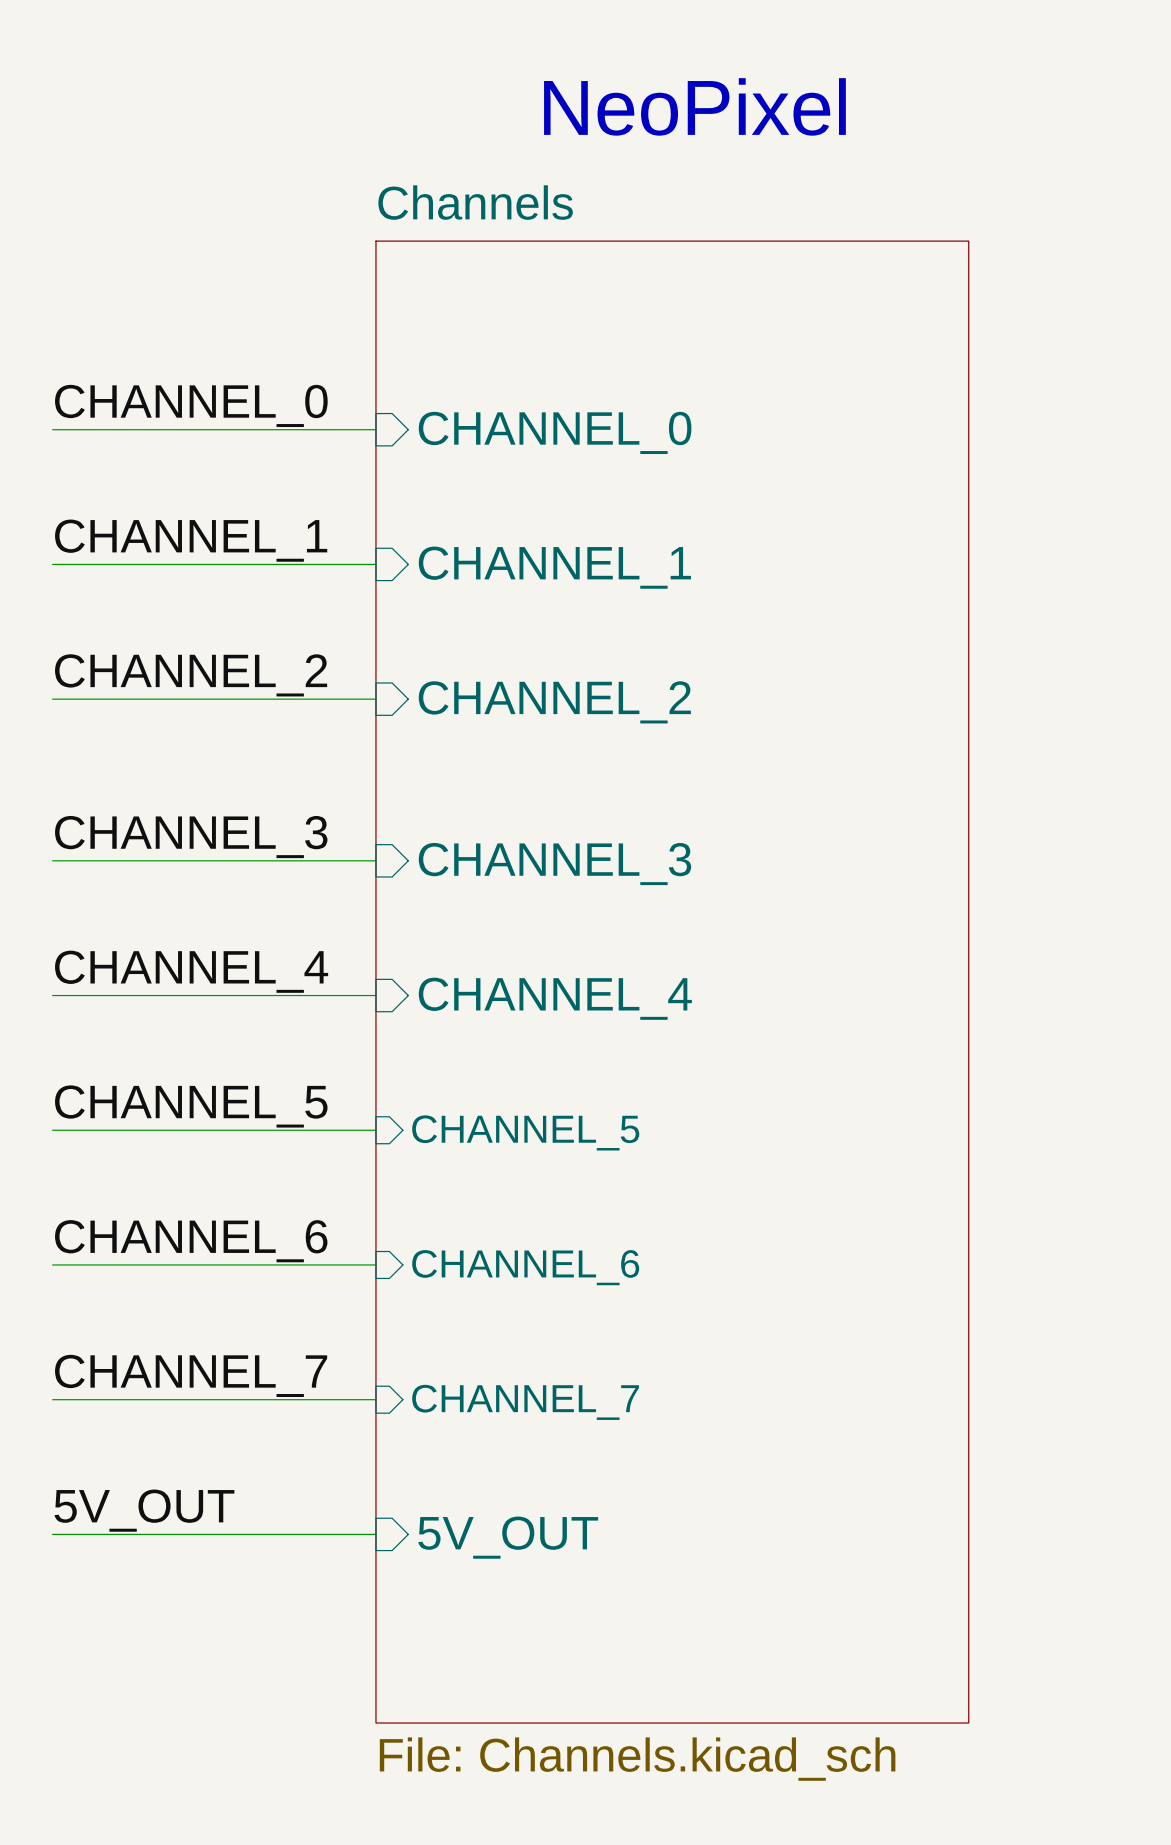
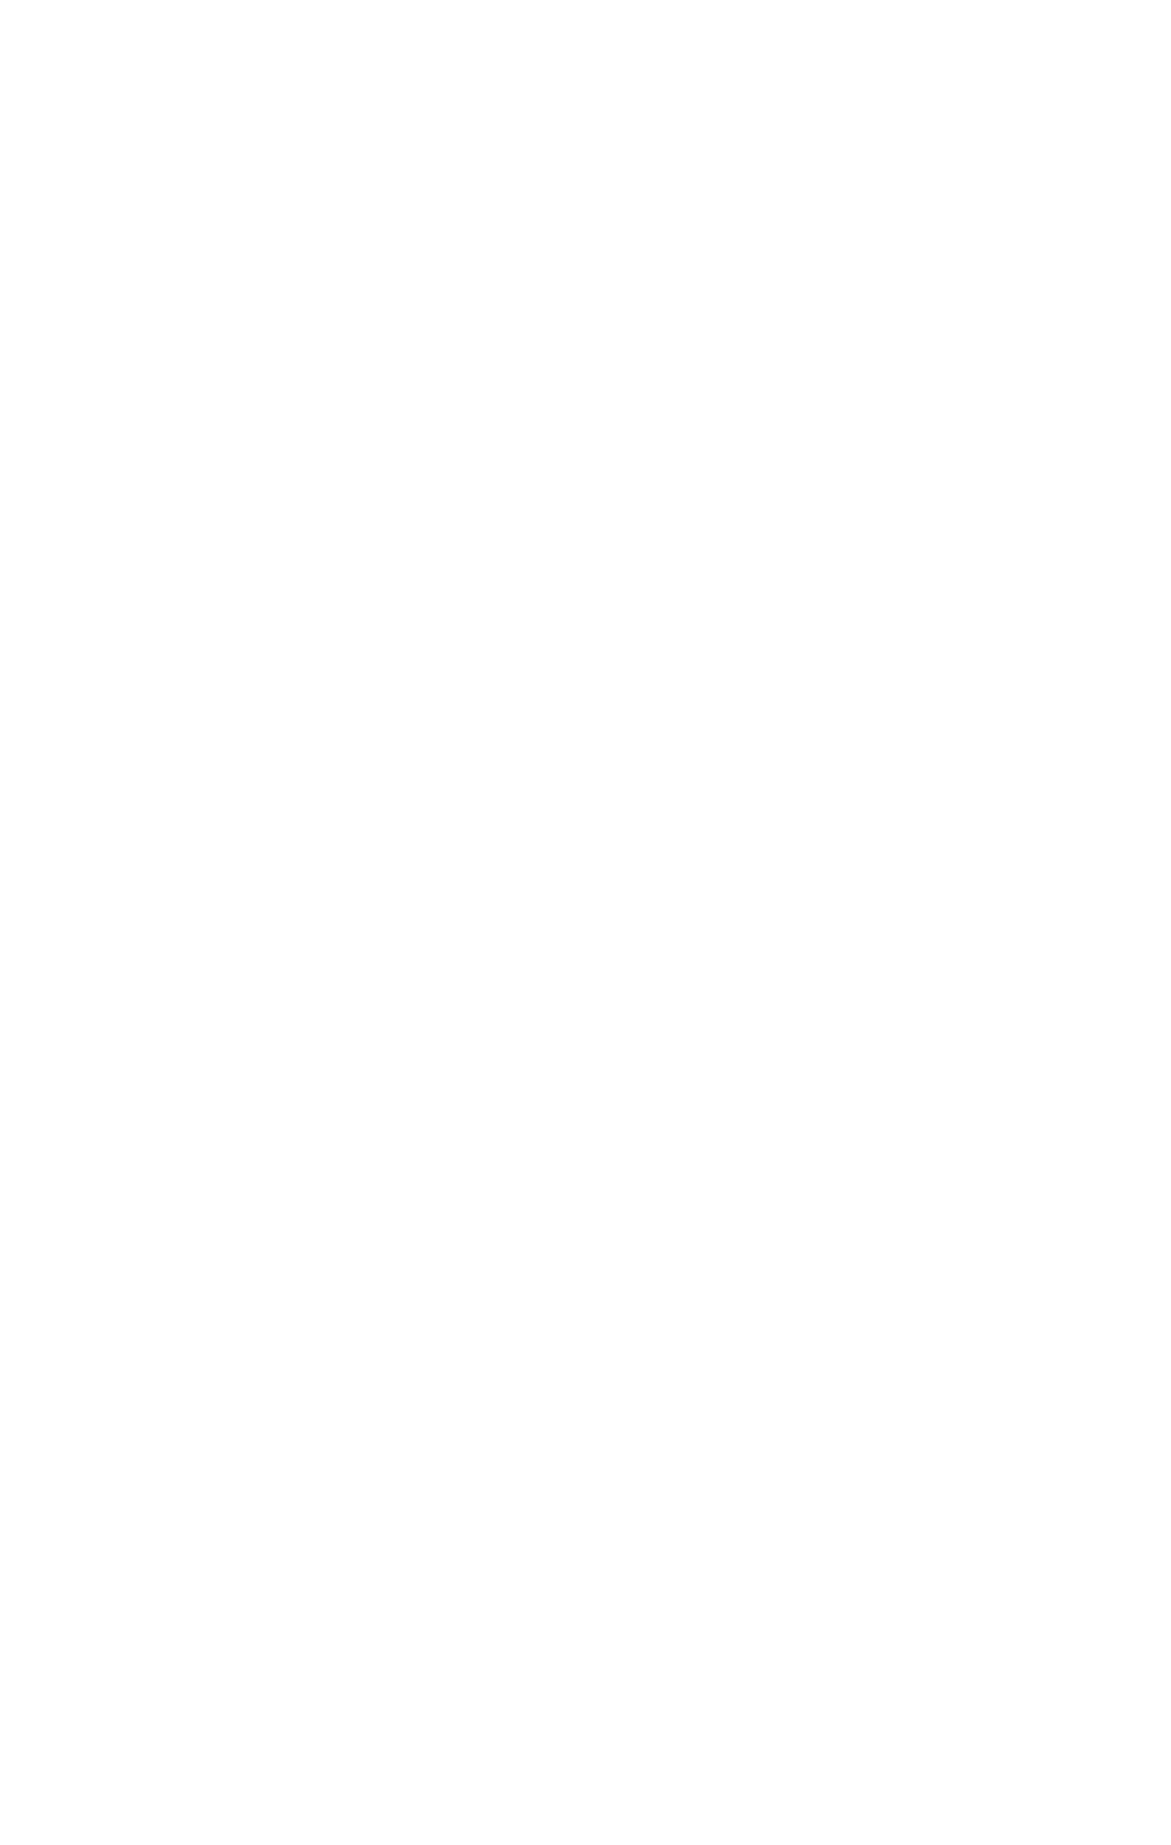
text: NeoPixel (694, 106) -> none
label: CHANNEL_0 (191, 405) -> none
wire: (52, 429) (375, 429) -> none
sheet pin: CHANNEL_0 (555, 432) -> none
label: CHANNEL_1 (191, 540) -> none
wire: (52, 564) (375, 564) -> none
sheet pin: CHANNEL_1 (554, 567) -> none
label: CHANNEL_2 (191, 675) -> none
wire: (52, 699) (375, 699) -> none
sheet pin: CHANNEL_2 (554, 702) -> none
label: CHANNEL_3 (191, 837) -> none
wire: (52, 860) (375, 860) -> none
sheet pin: CHANNEL_3 (554, 864) -> none
label: CHANNEL_4 (191, 971) -> none
sheet Channels: File: Channels.kicad_sch (672, 982) -> none
wire: (52, 995) (375, 995) -> none
sheet pin: CHANNEL_4 (555, 998) -> none
label: CHANNEL_5 (191, 1106) -> none
wire: (52, 1130) (375, 1130) -> none
sheet pin: CHANNEL_5 (525, 1132) -> none
label: CHANNEL_6 (191, 1241) -> none
wire: (52, 1264) (375, 1264) -> none
sheet pin: CHANNEL_6 (525, 1267) -> none
label: CHANNEL_7 (191, 1375) -> none
wire: (52, 1399) (375, 1399) -> none
sheet pin: CHANNEL_7 (525, 1402) -> none
label: 5V_OUT (144, 1510) -> none
wire: (52, 1534) (375, 1534) -> none
sheet pin: 5V_OUT (508, 1537) -> none

